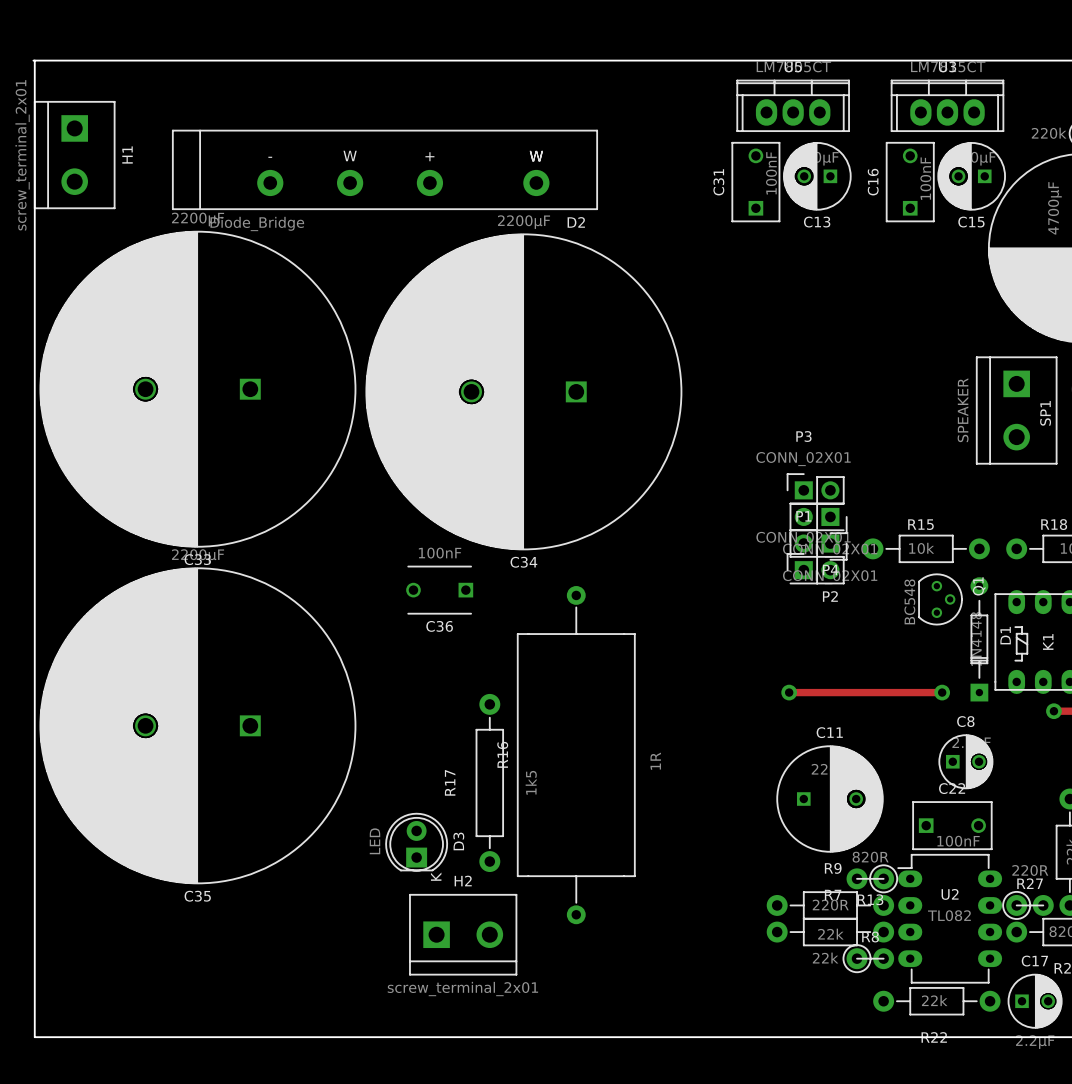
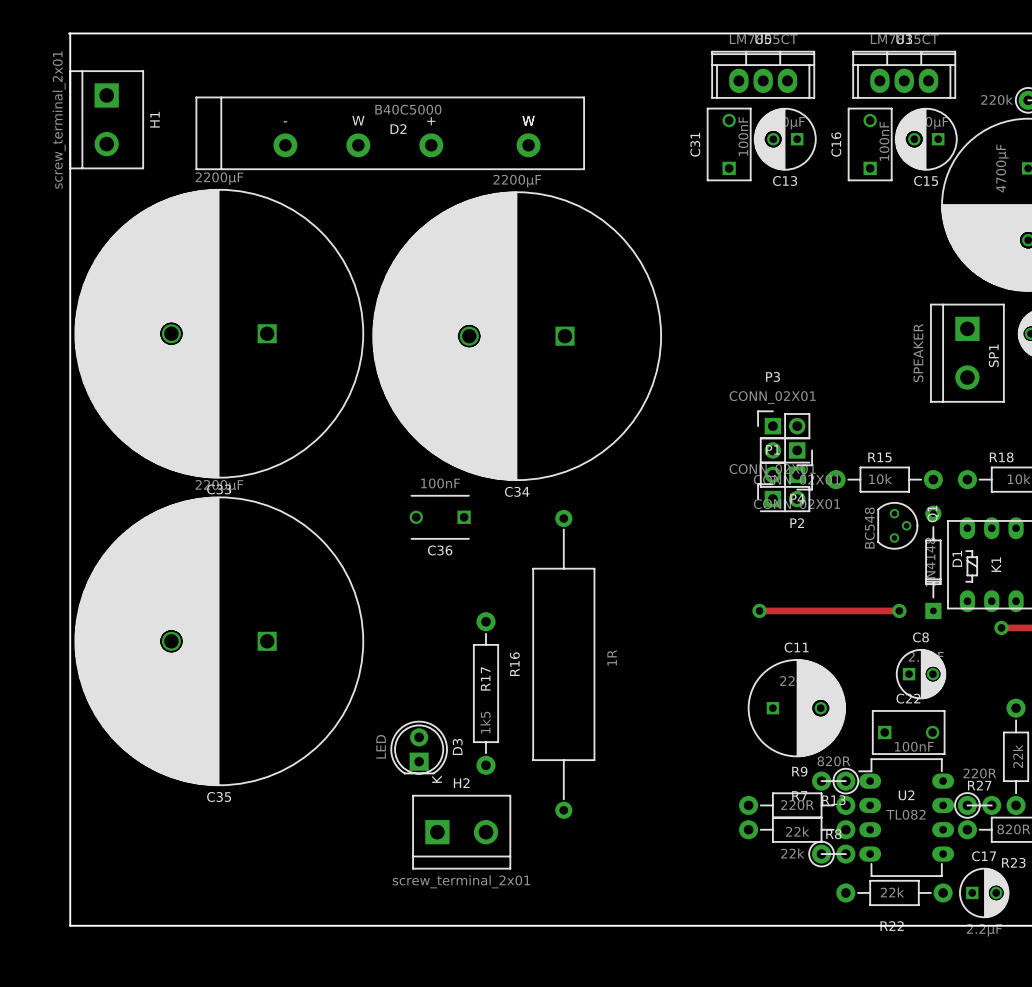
D2 name position: D2 (576, 222) -> D2 (398, 129)
D2 value: Diode_Bridge (257, 223) -> B40C5000 (408, 109)
R16 footprint: [516, 586, 636, 925] -> [532, 509, 596, 819]
R16 value position: 1R (655, 761) -> 1R (612, 657)
R17 name position: R17 (450, 782) -> R17 (485, 678)
R17 value position: 1k5 (531, 782) -> 1k5 (485, 722)

